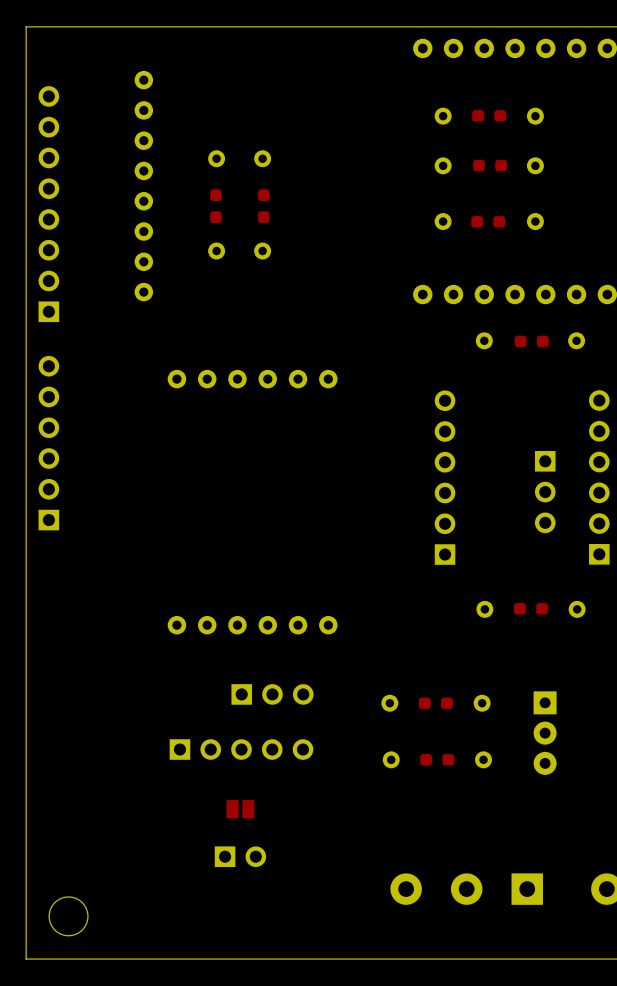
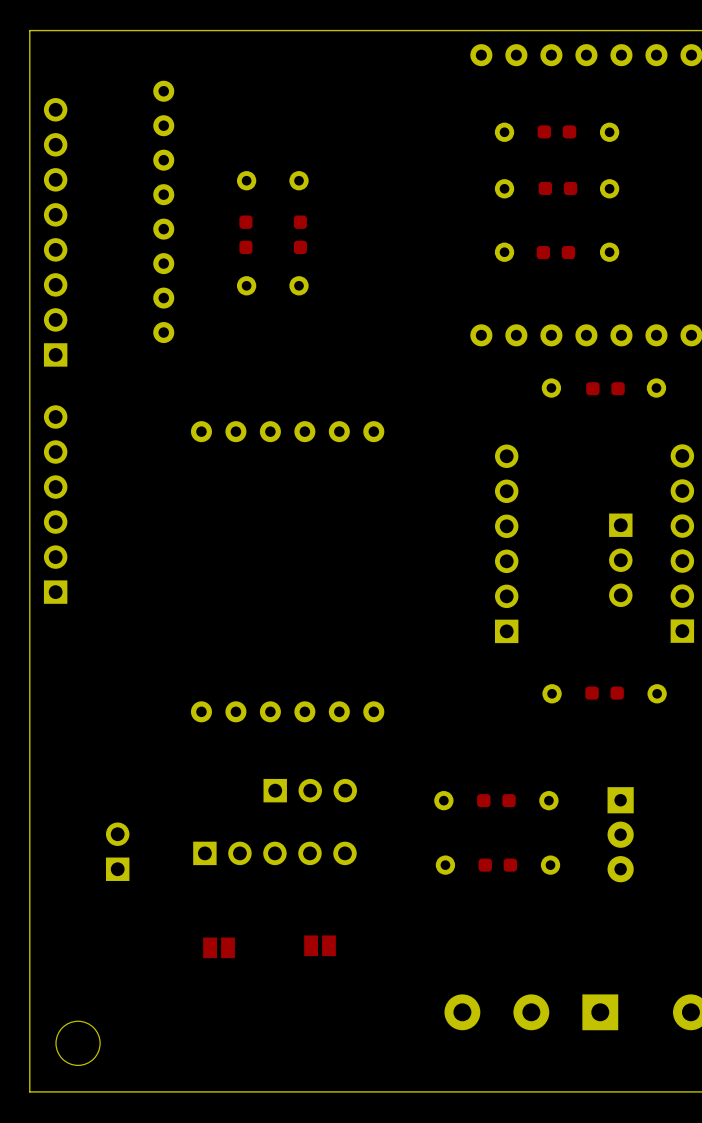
part: (240, 809) -> none
part: none -> (320, 945)
part: none -> (219, 947)
part rotation: 0° (240, 856) -> 90° counterclockwise (117, 851)
part position: (240, 856) -> (117, 851)

